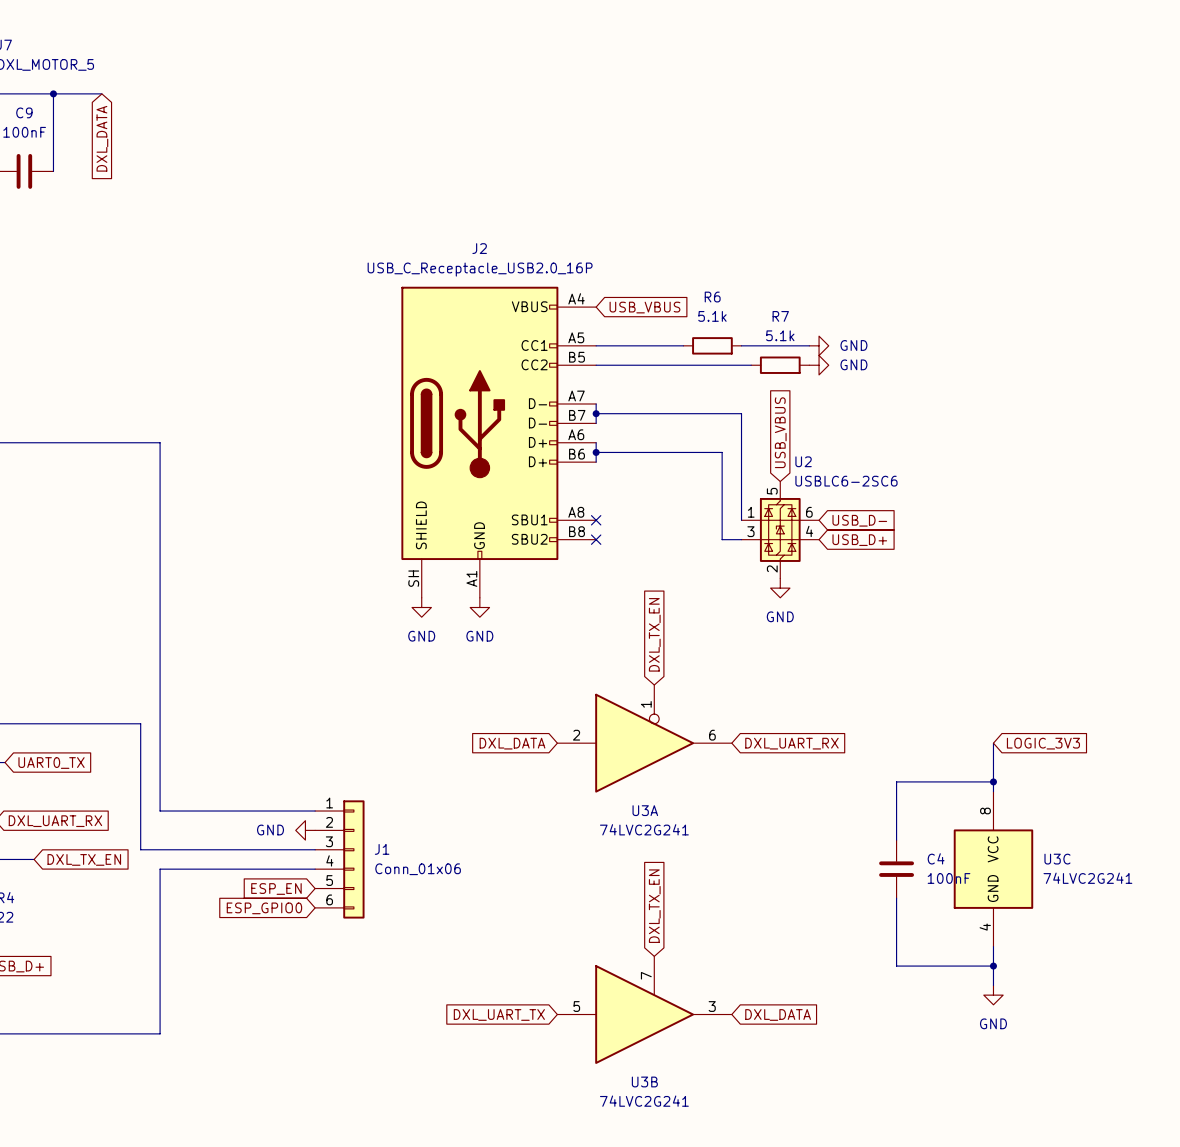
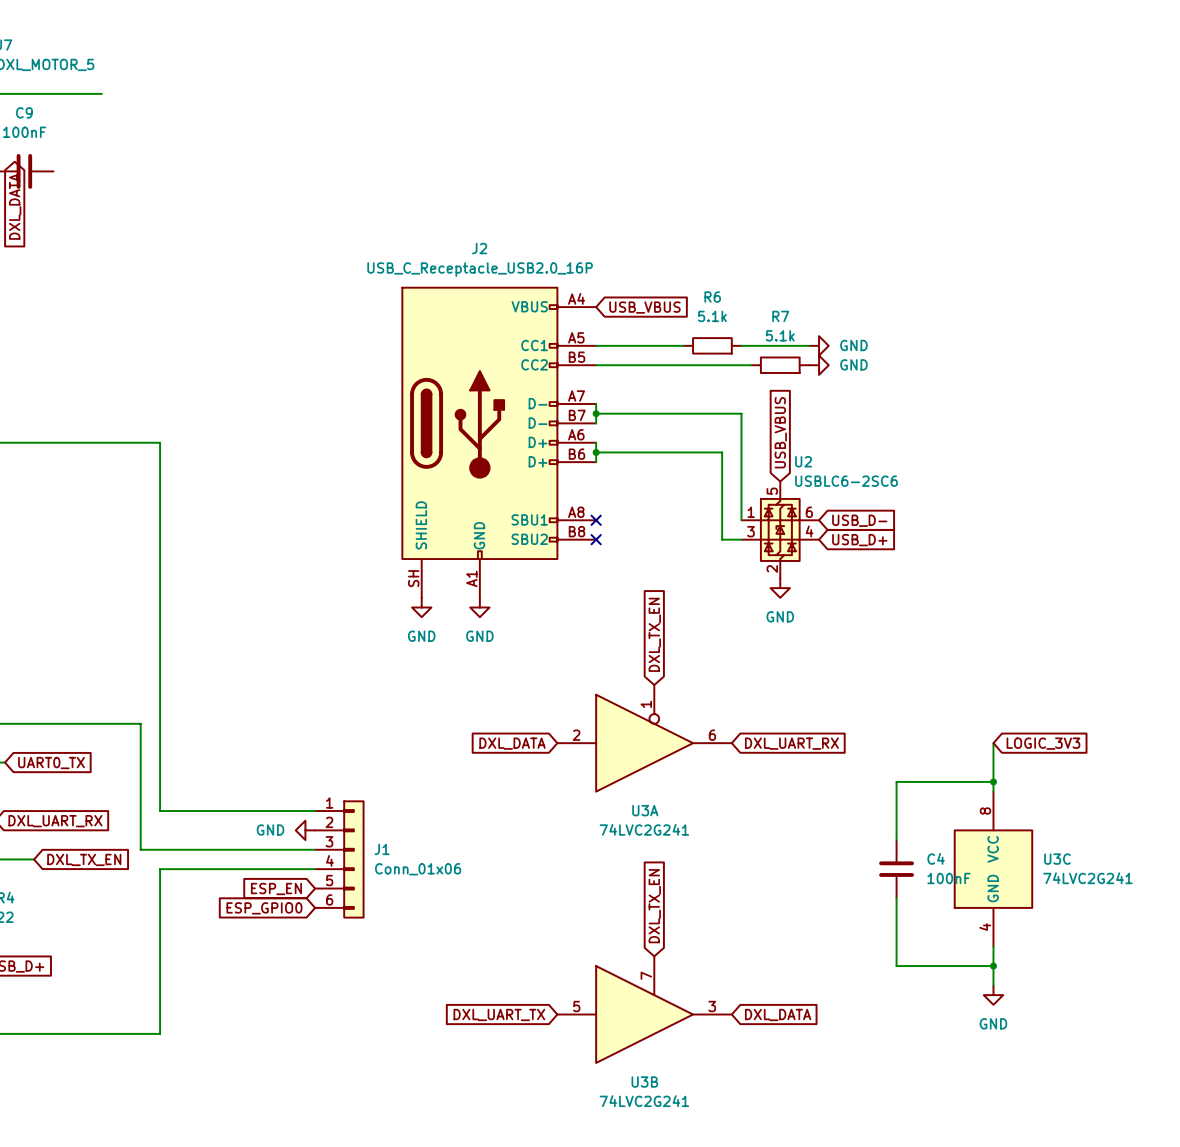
wire: (53, 93) (53, 171) -> none
junction: (53, 93) -> none
global label position: DXL_DATA (102, 138) -> DXL_DATA (15, 206)

